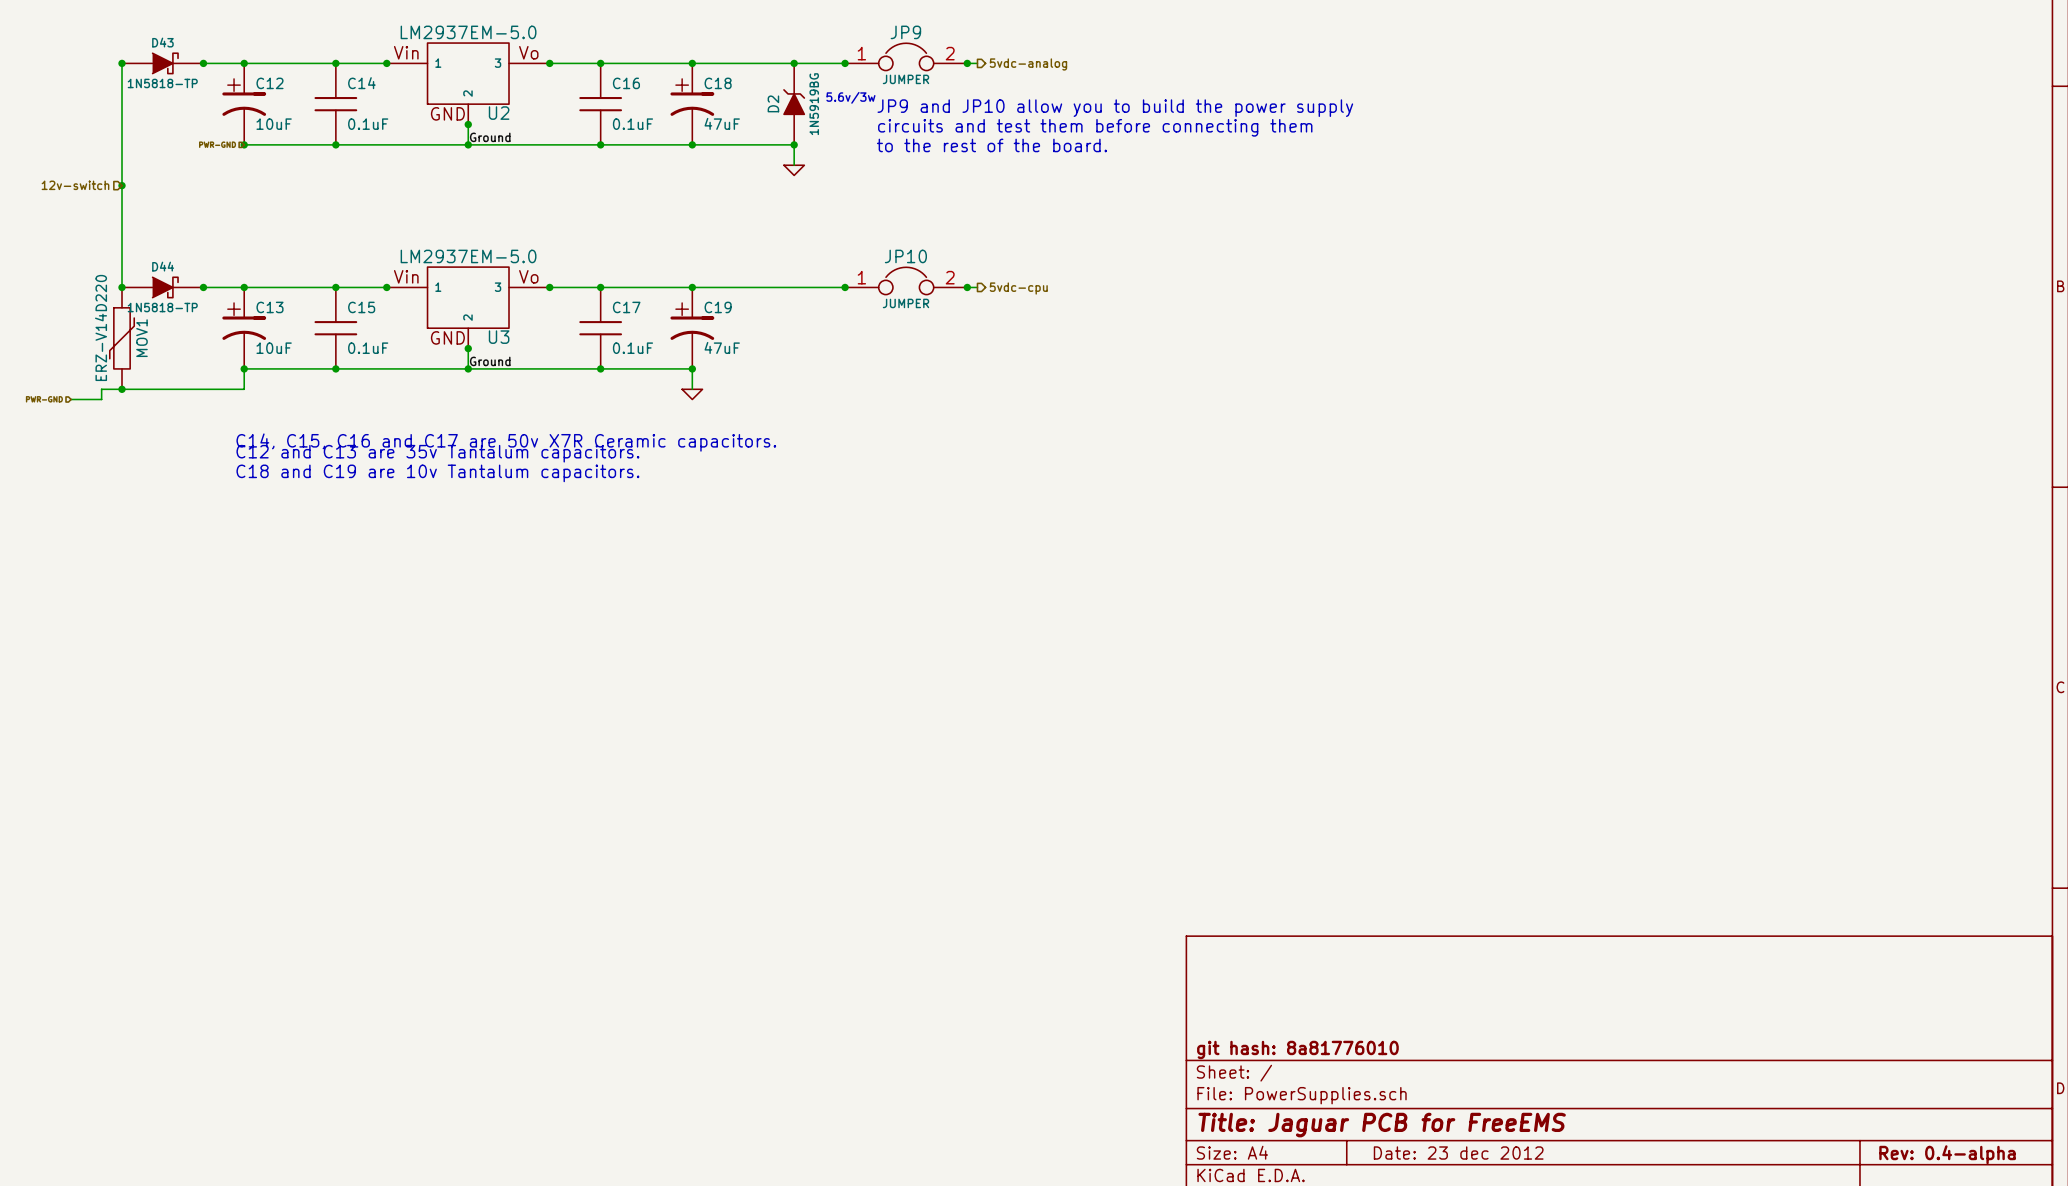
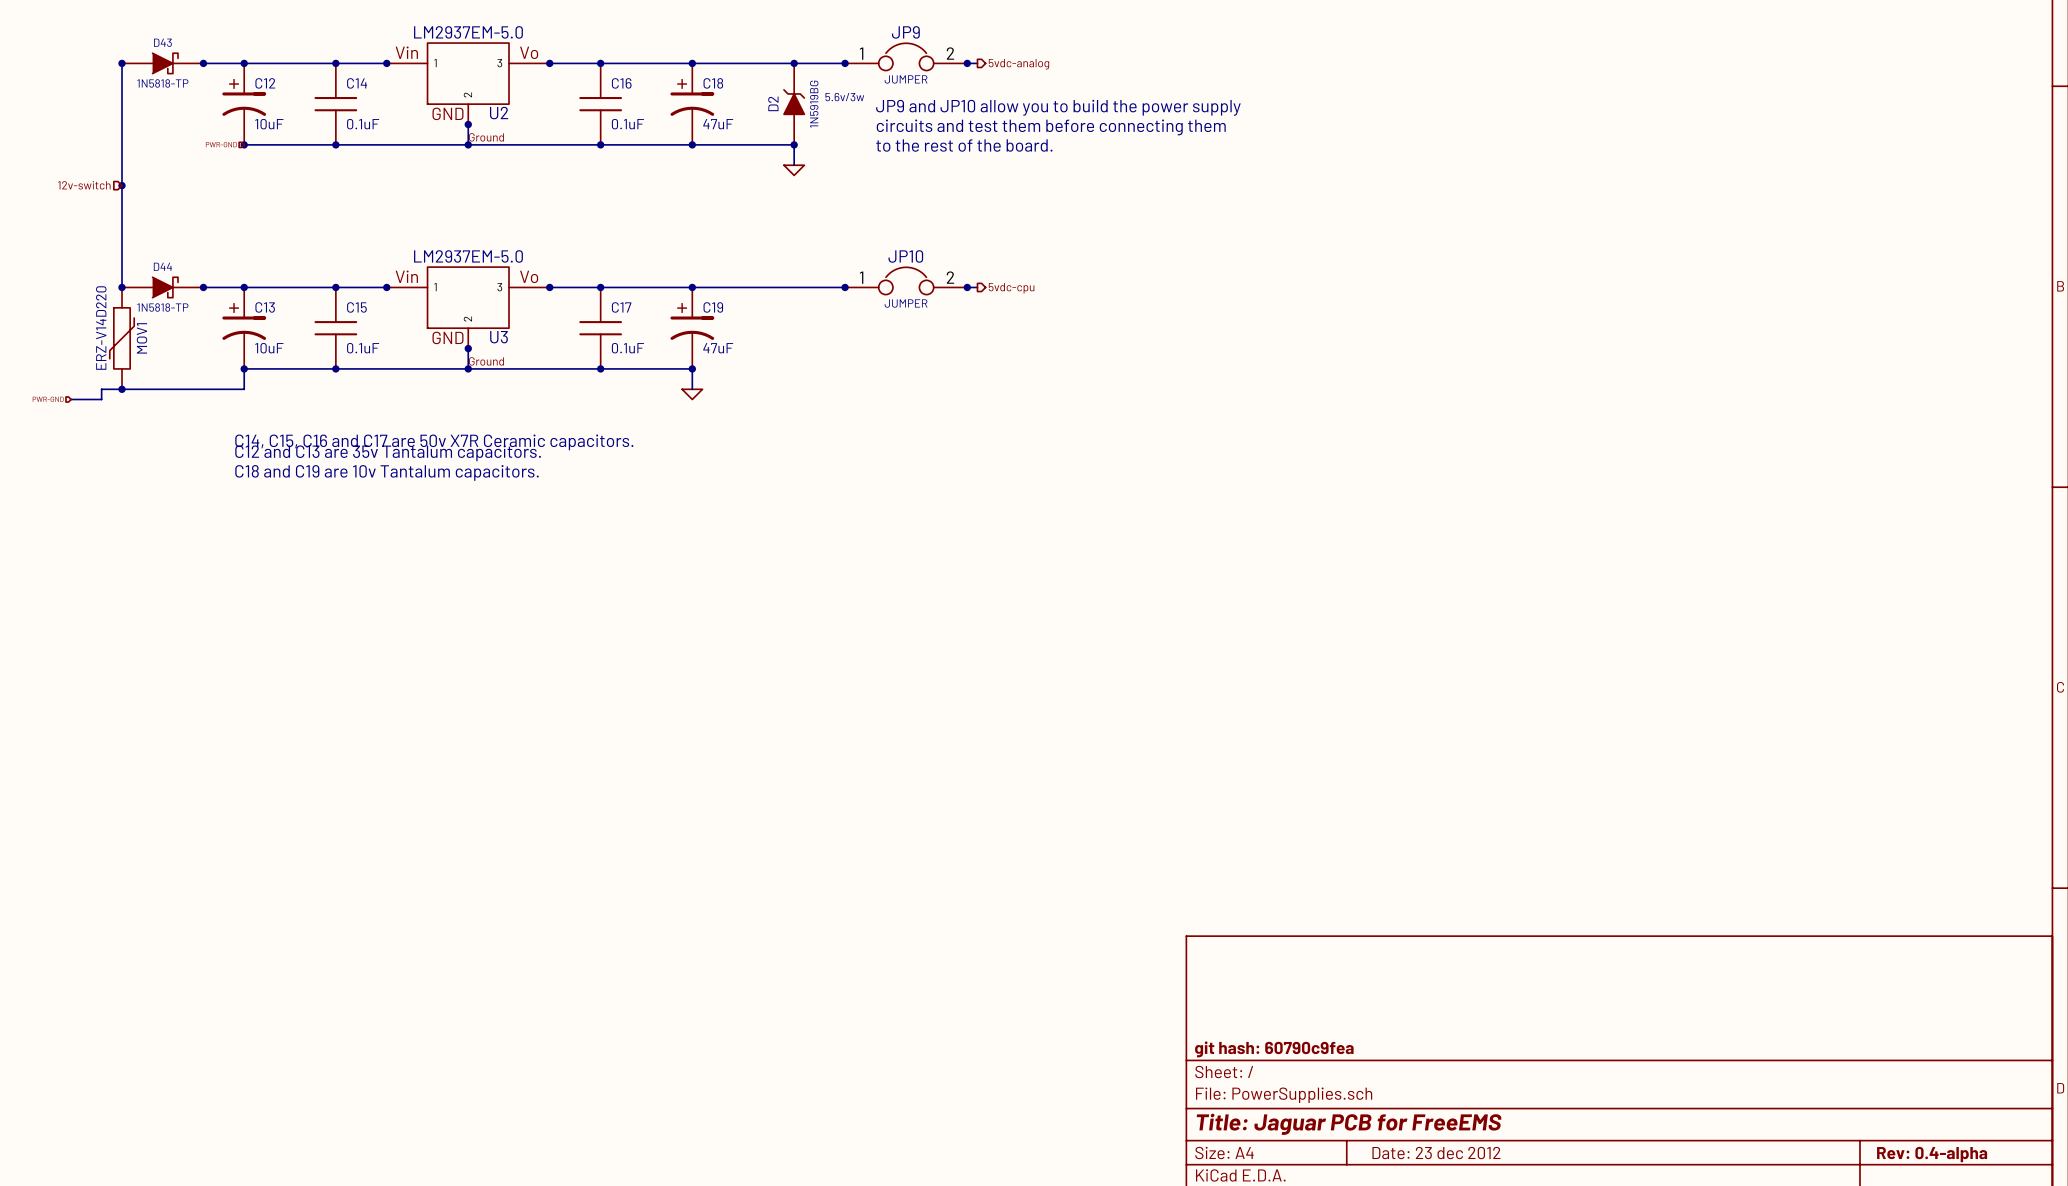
title block: git hash: 8a81776010 (1297, 1049) -> git hash: 60790c9fea (1274, 1049)

